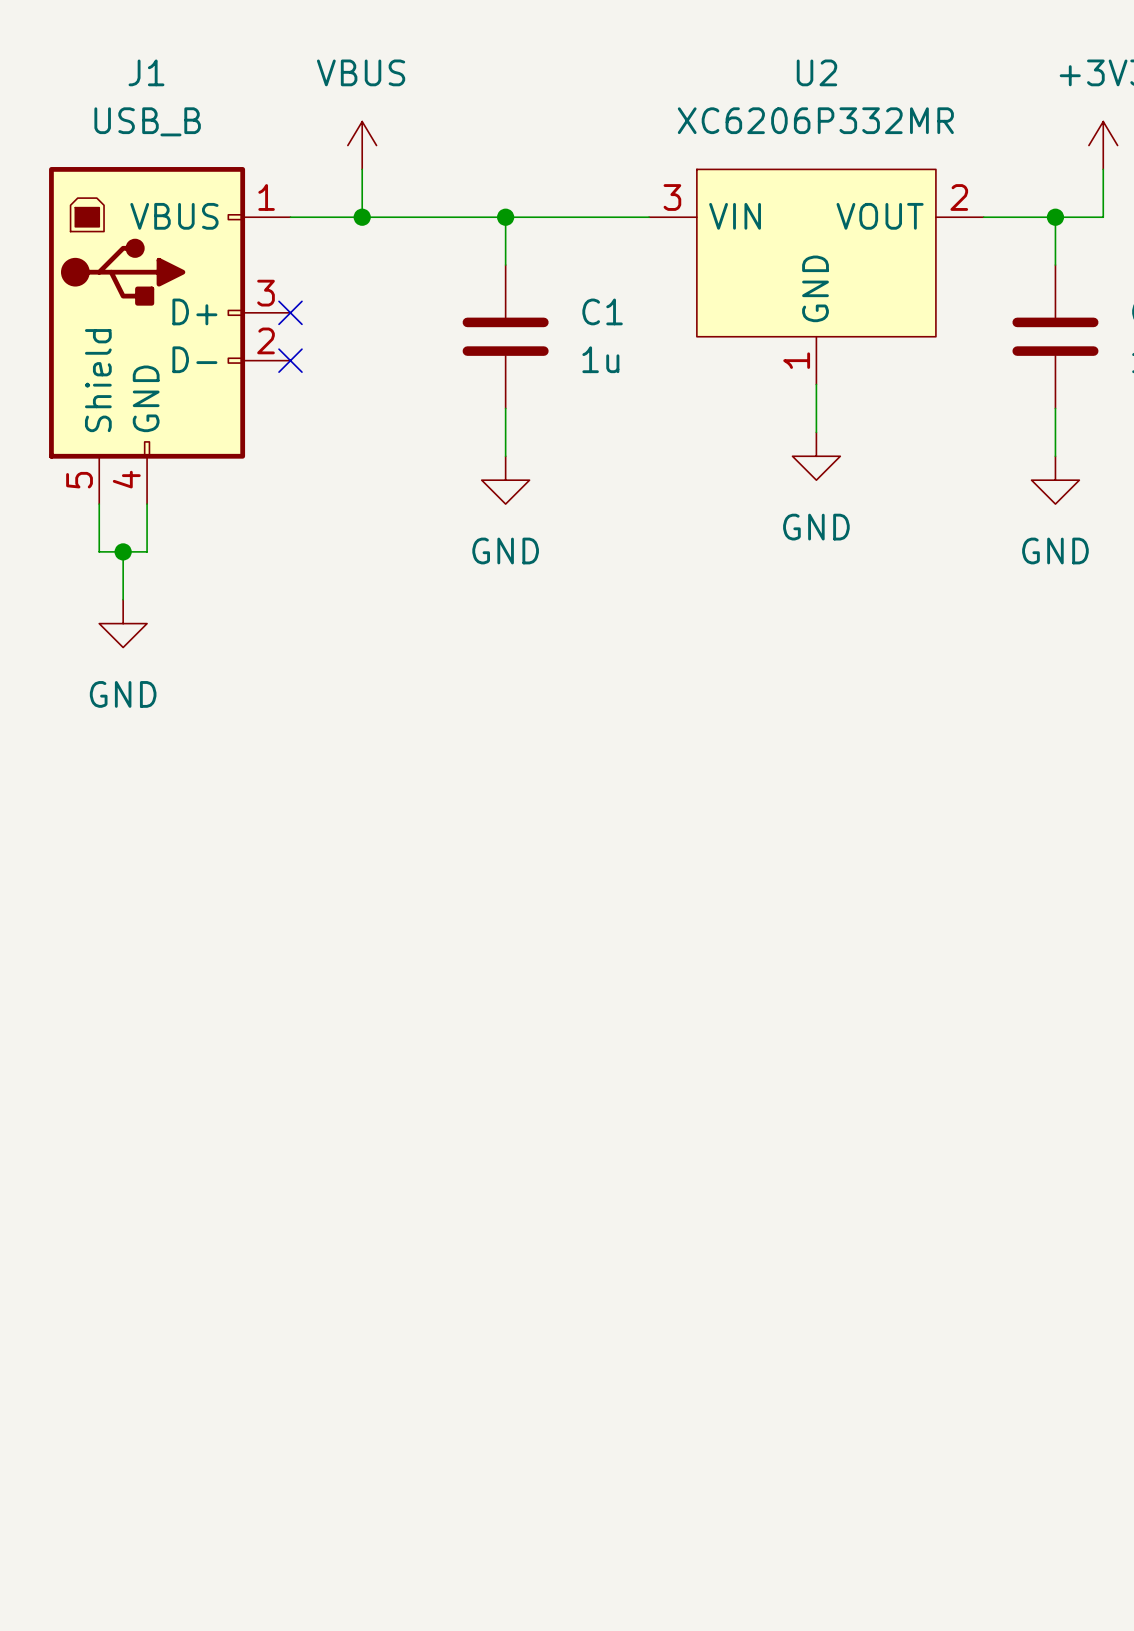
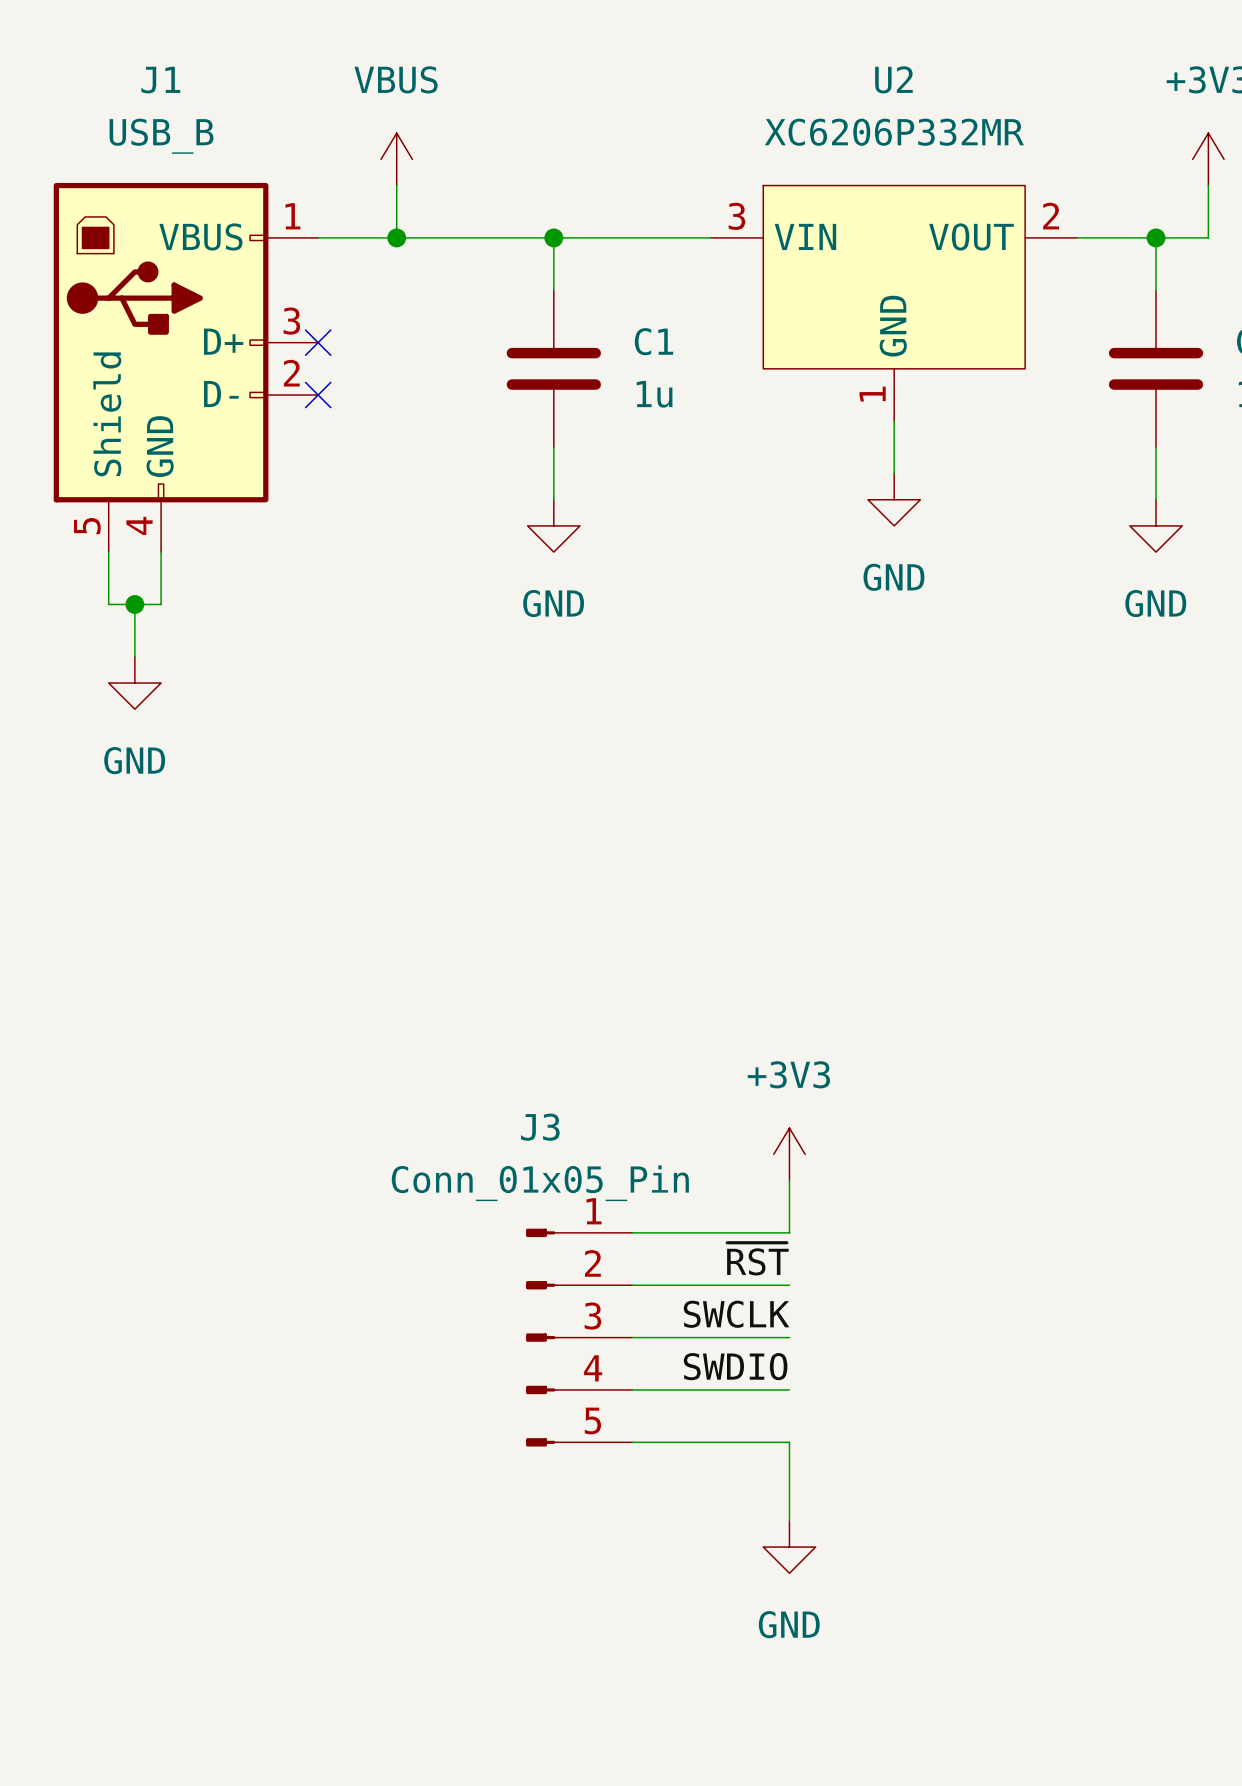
power symbol: none -> +3V3 (789, 1154)
wire: none -> (789, 1180) (789, 1232) (632, 1232)
label: none -> ~{RST} (757, 1259)
wire: none -> (632, 1285) (789, 1285)
label: none -> SWCLK (736, 1314)
J3: none -> Conn_01x05_Pin (579, 1337)
wire: none -> (632, 1337) (789, 1337)
label: none -> SWDIO (735, 1366)
wire: none -> (632, 1389) (789, 1389)
wire: none -> (632, 1442) (789, 1442) (789, 1520)
power symbol: none -> GND (789, 1547)

